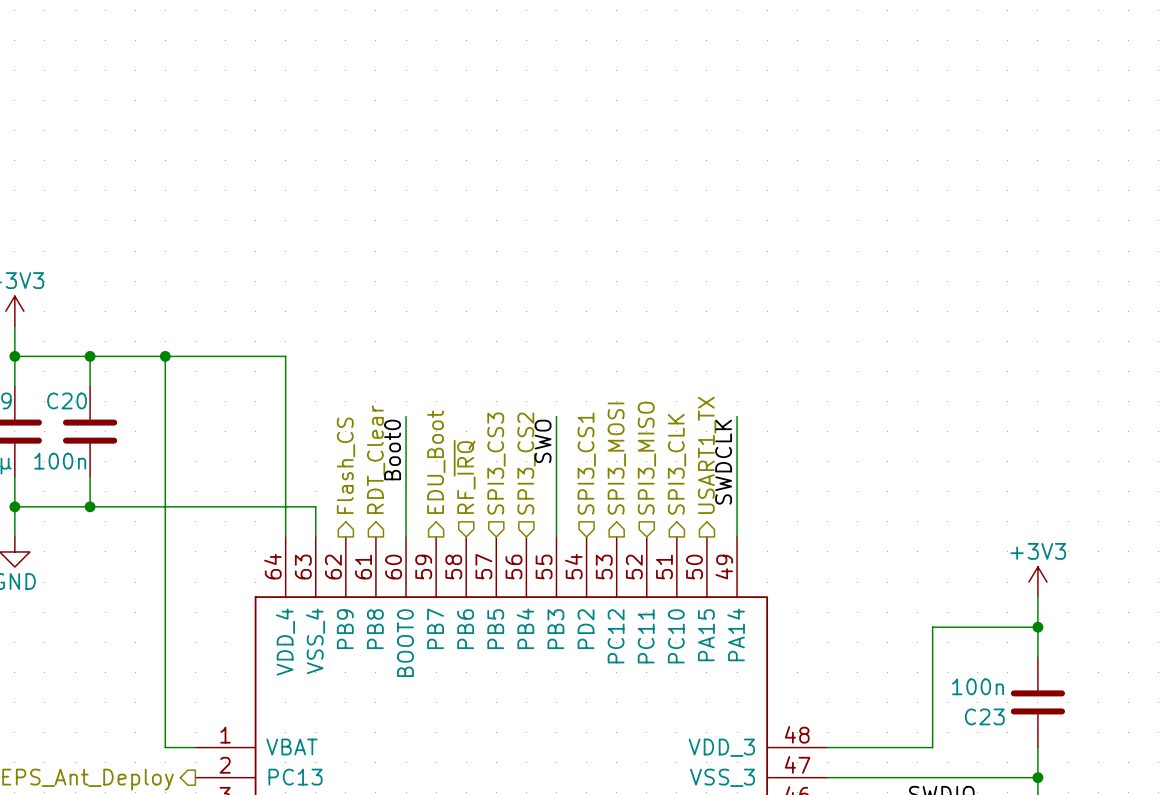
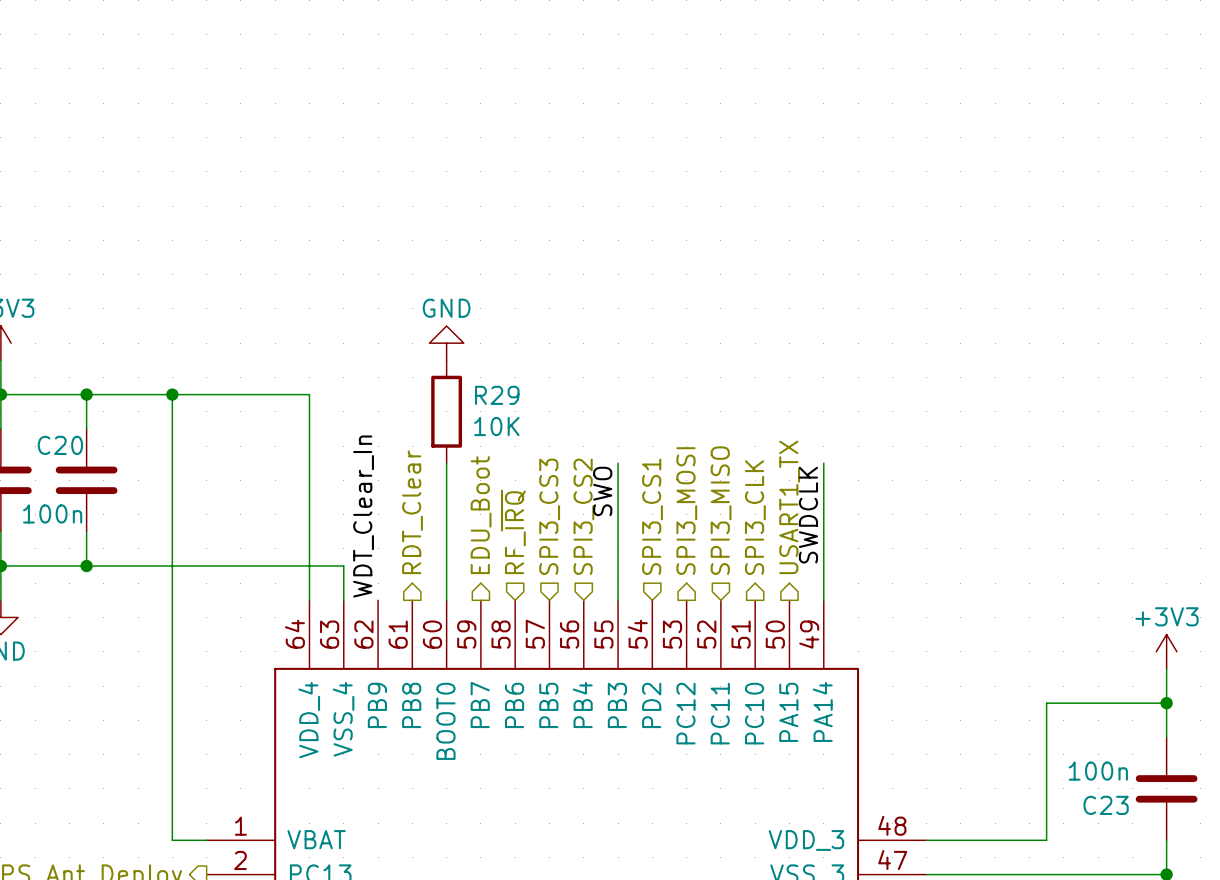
power symbol: none -> GND (446, 343)
R29: none -> 10K (446, 411)
label: Boot0 (392, 449) -> none
label: none -> WDT_Clear_In (363, 516)
hierarchical label: Flash_CS (346, 465) -> none

